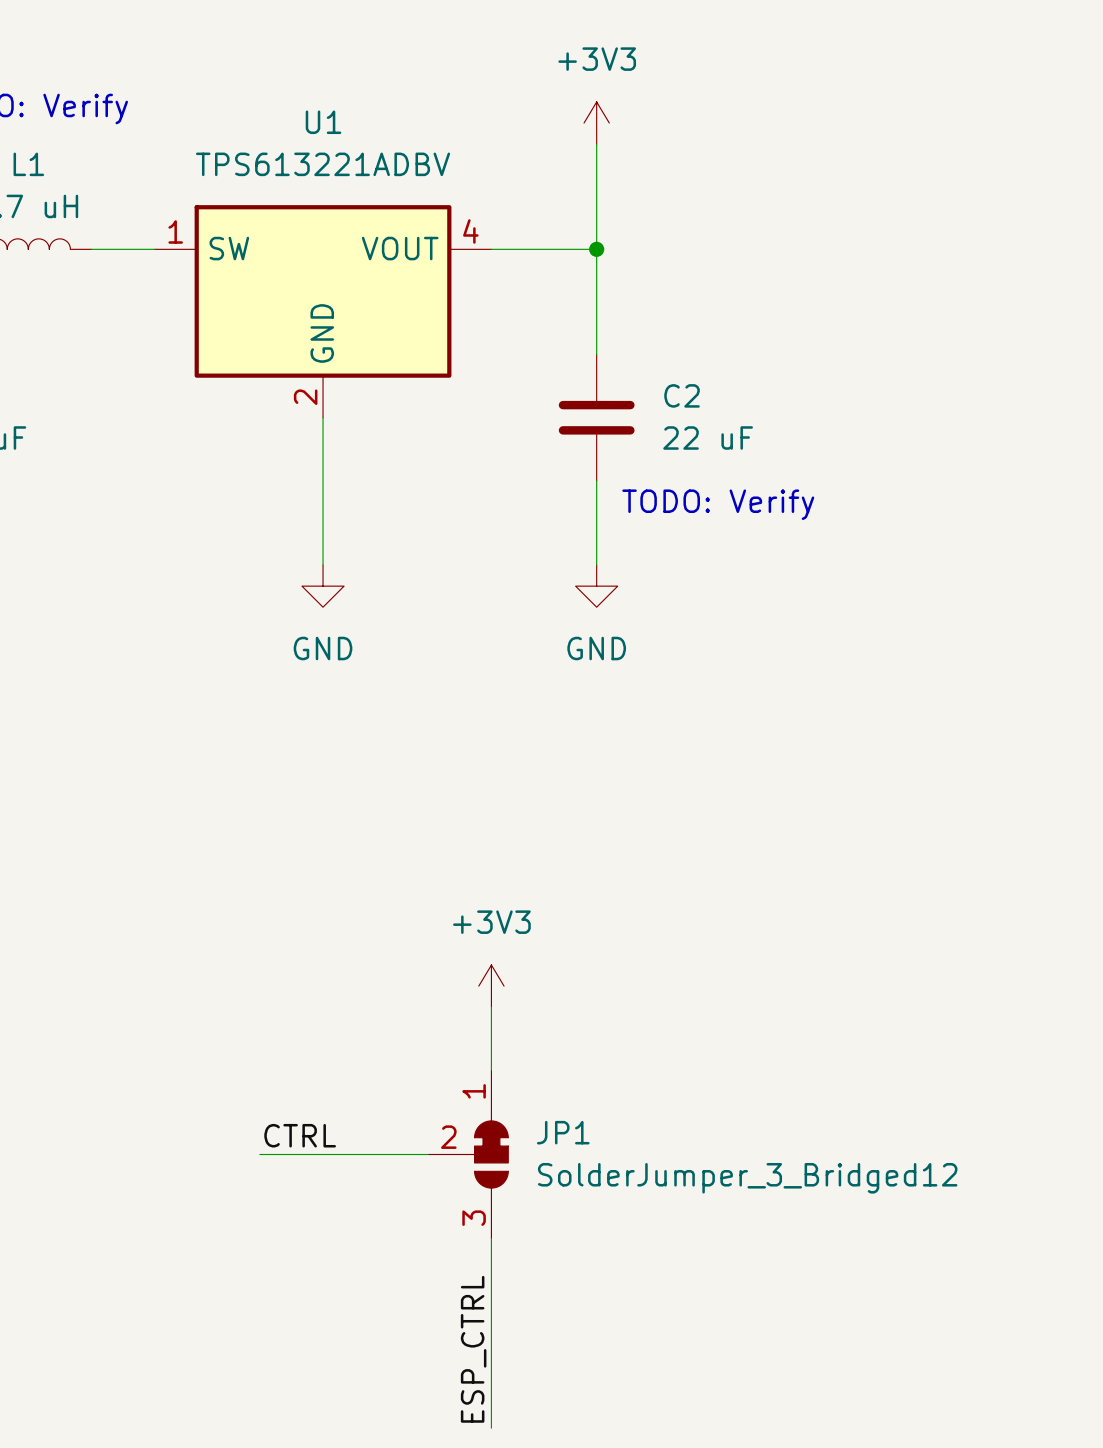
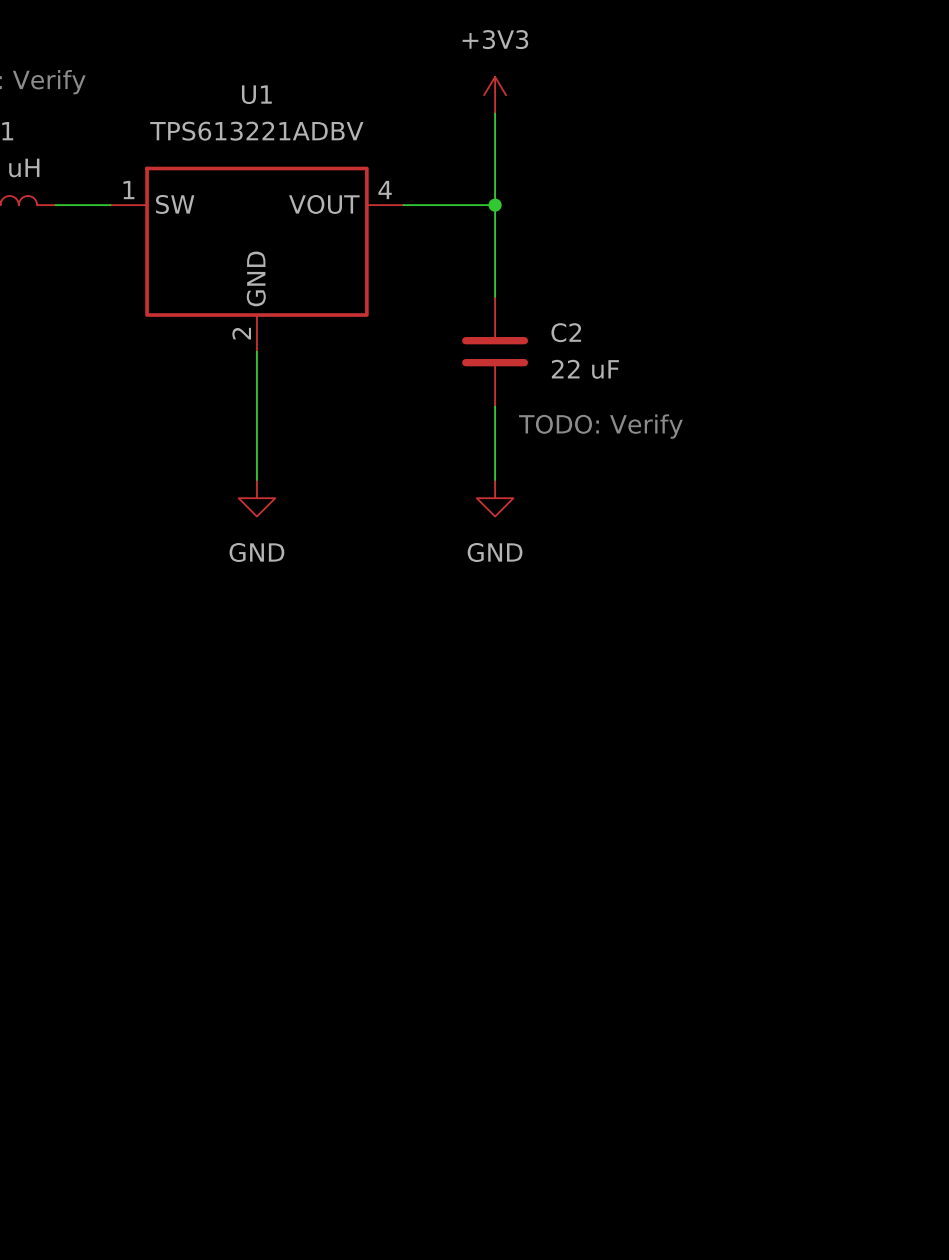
power symbol: +3V3 (491, 986) -> none
wire: (491, 1007) (491, 1070) -> none
label: CTRL (300, 1135) -> none
wire: (259, 1154) (428, 1154) -> none
JP1: SolderJumper_3_Bridged12 (468, 1154) -> none
wire: (491, 1238) (491, 1428) -> none
label: ESP_CTRL (473, 1349) -> none

